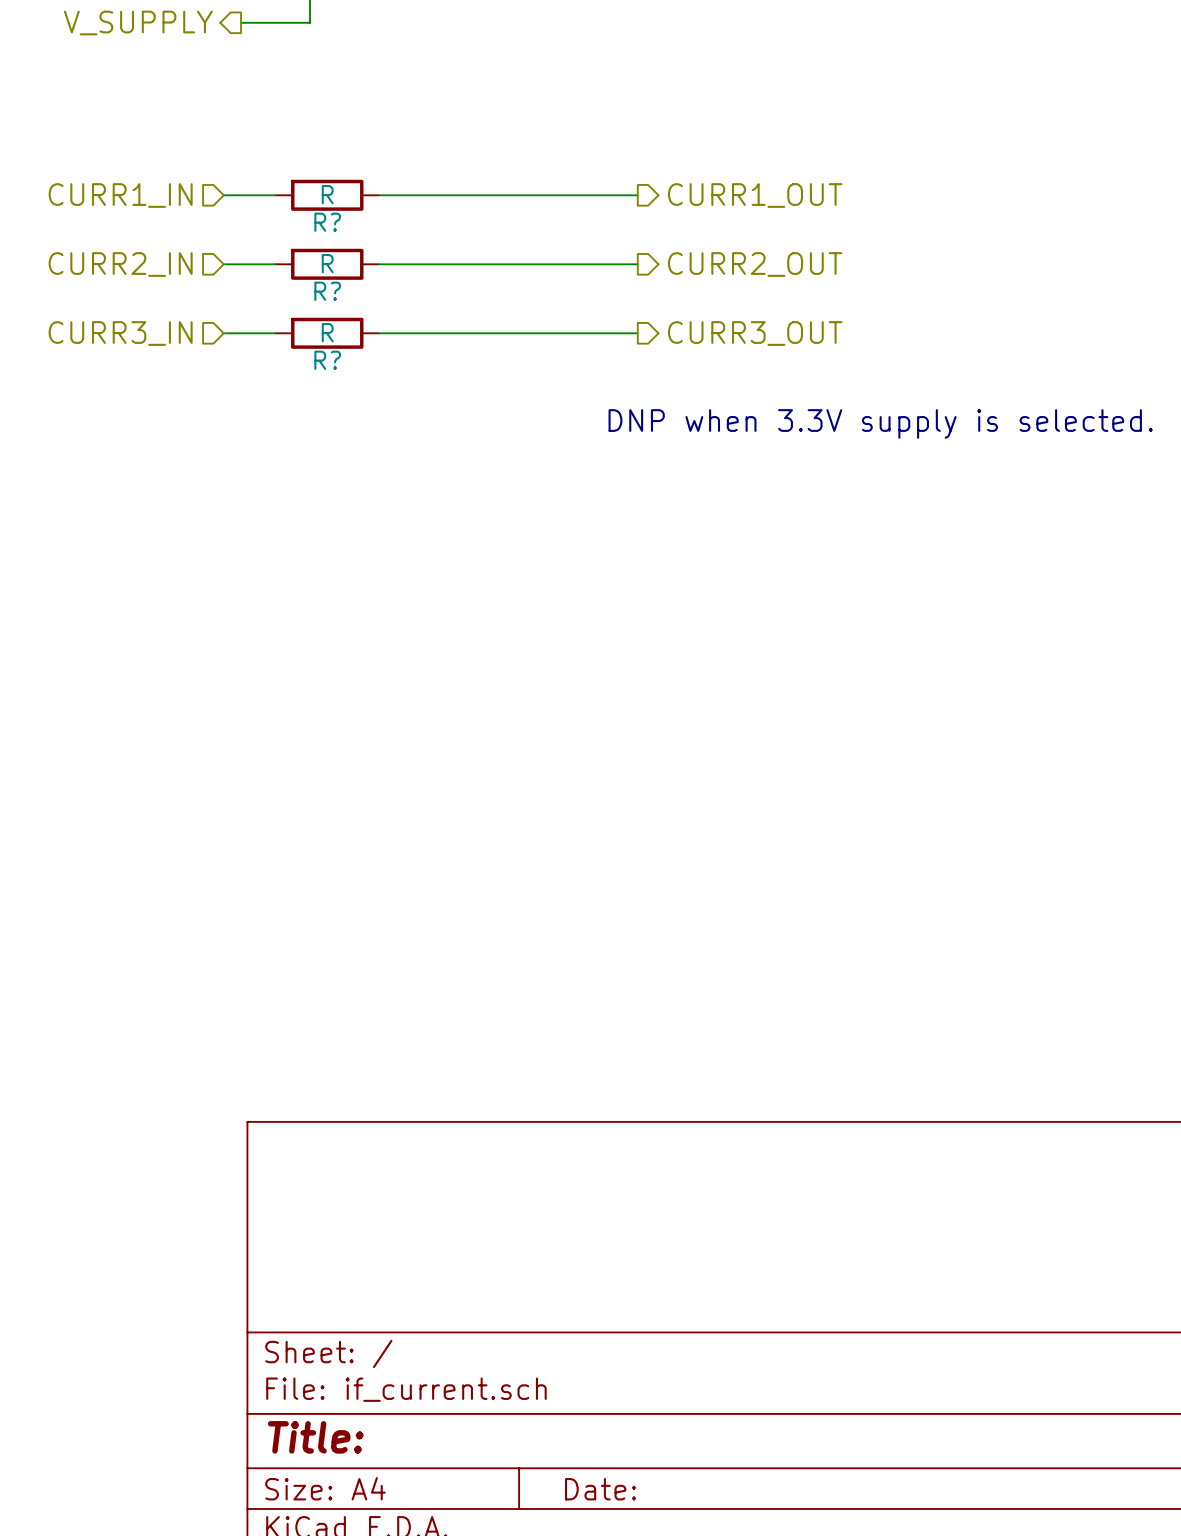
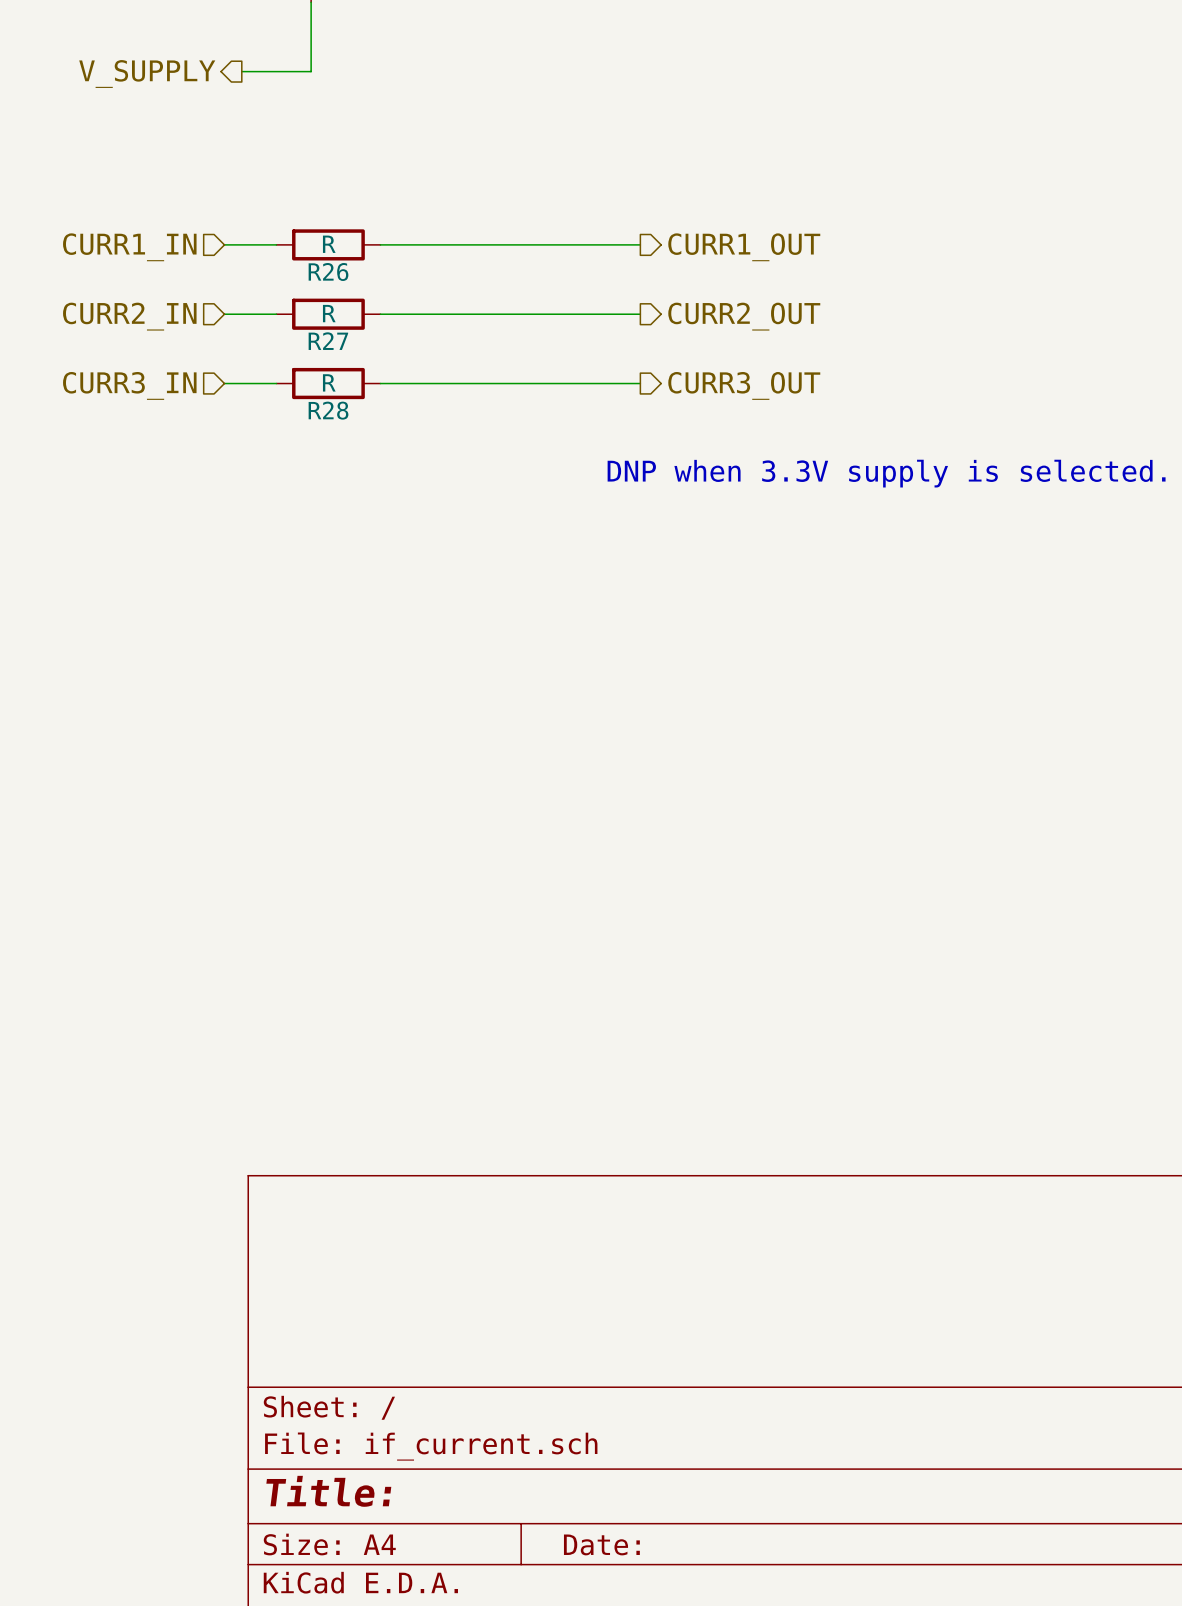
R? name: R? (327, 222) -> R26 (328, 271)
R? name: R? (327, 291) -> R27 (328, 341)
R? name: R? (327, 360) -> R28 (328, 410)

